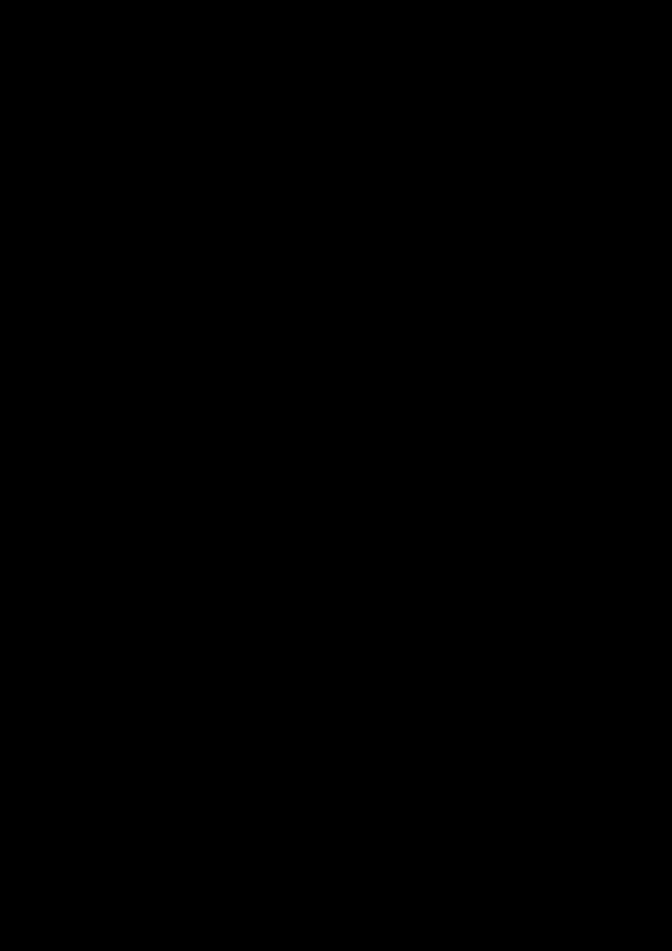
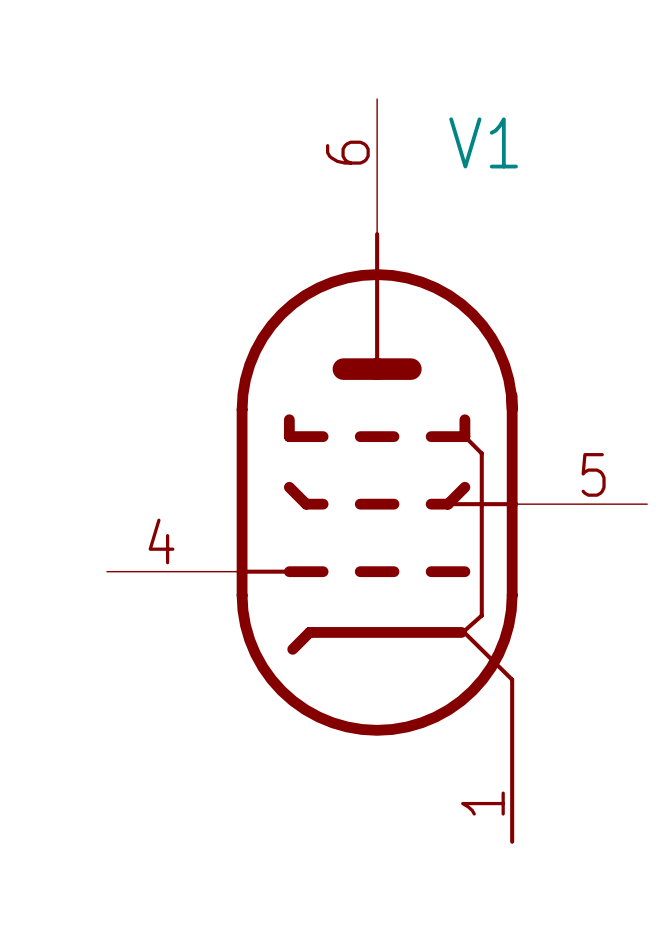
V1: none -> (377, 471)

